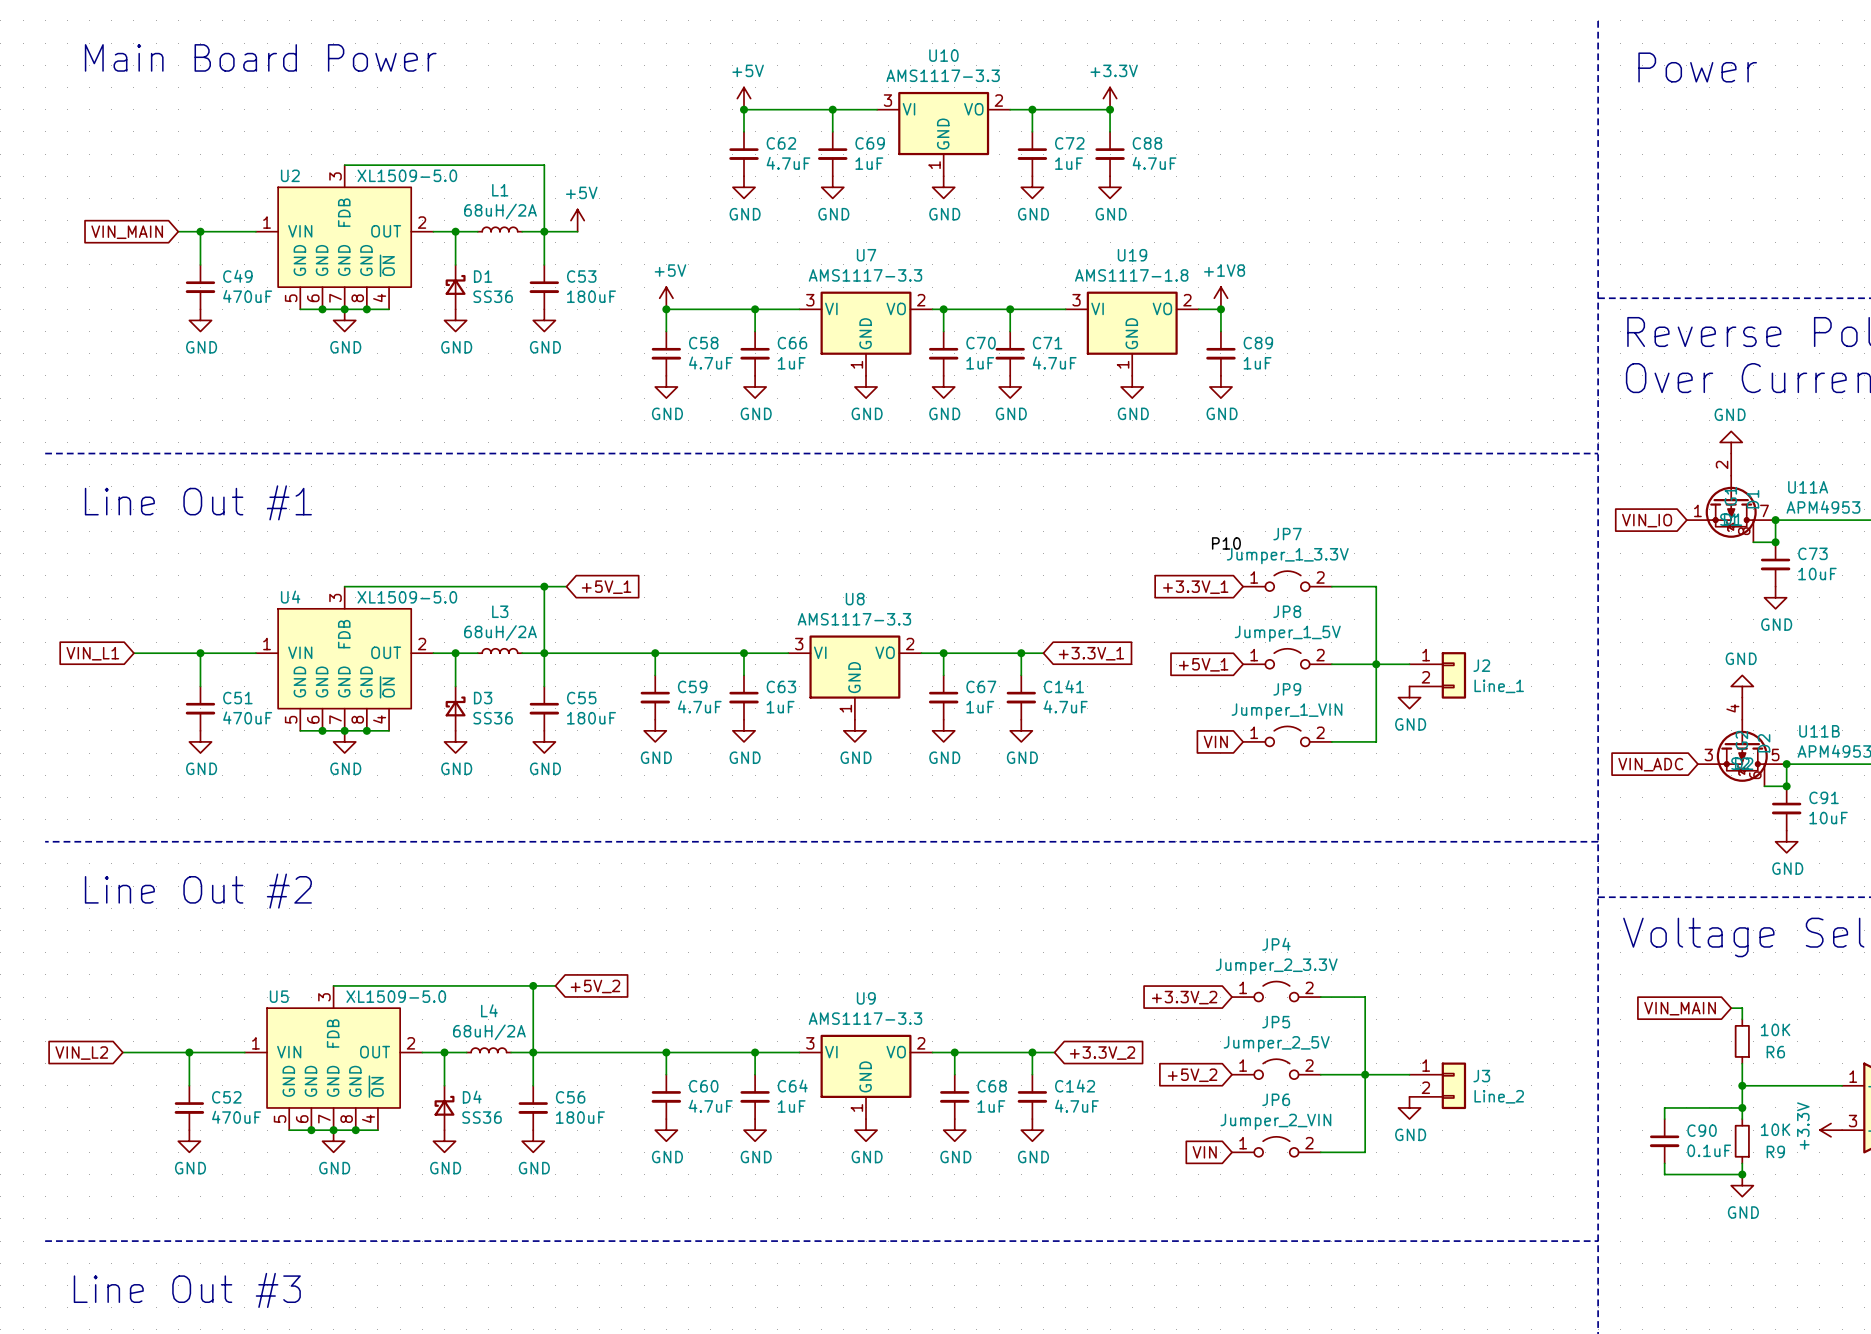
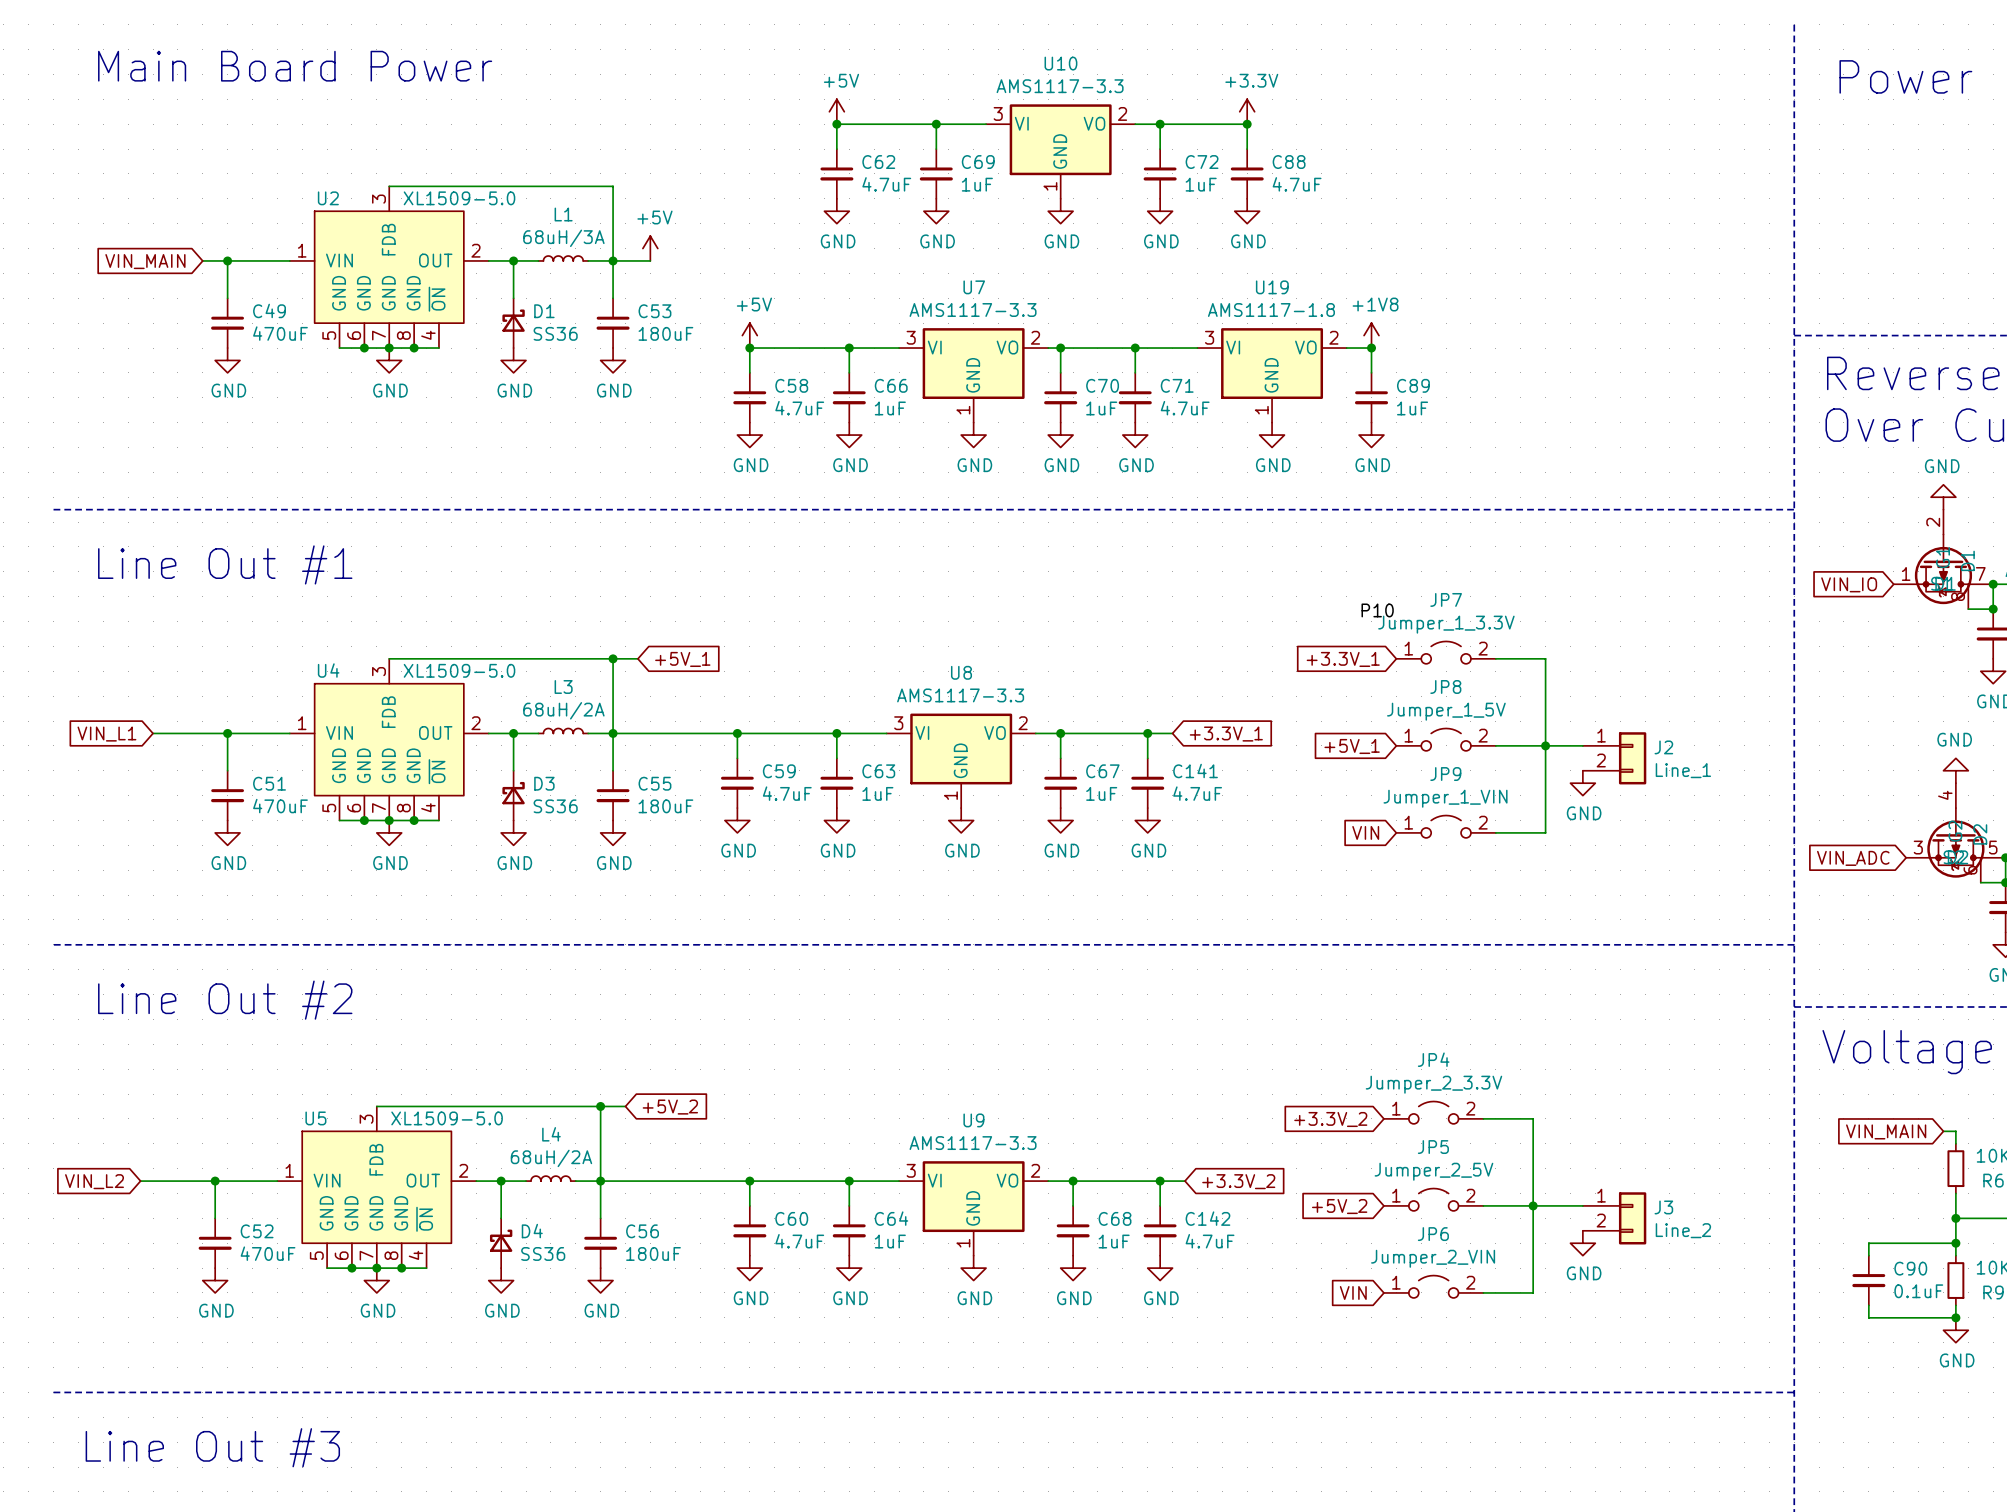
L1 value: 68uH/2A (500, 211) -> 68uH/3A (563, 238)

